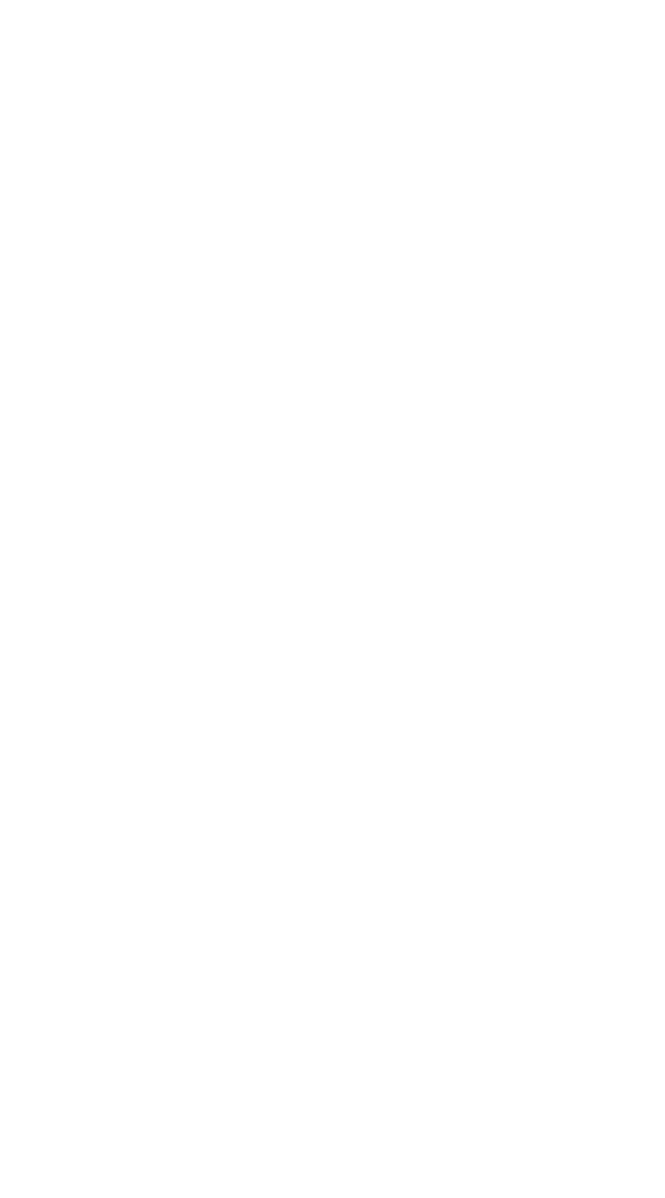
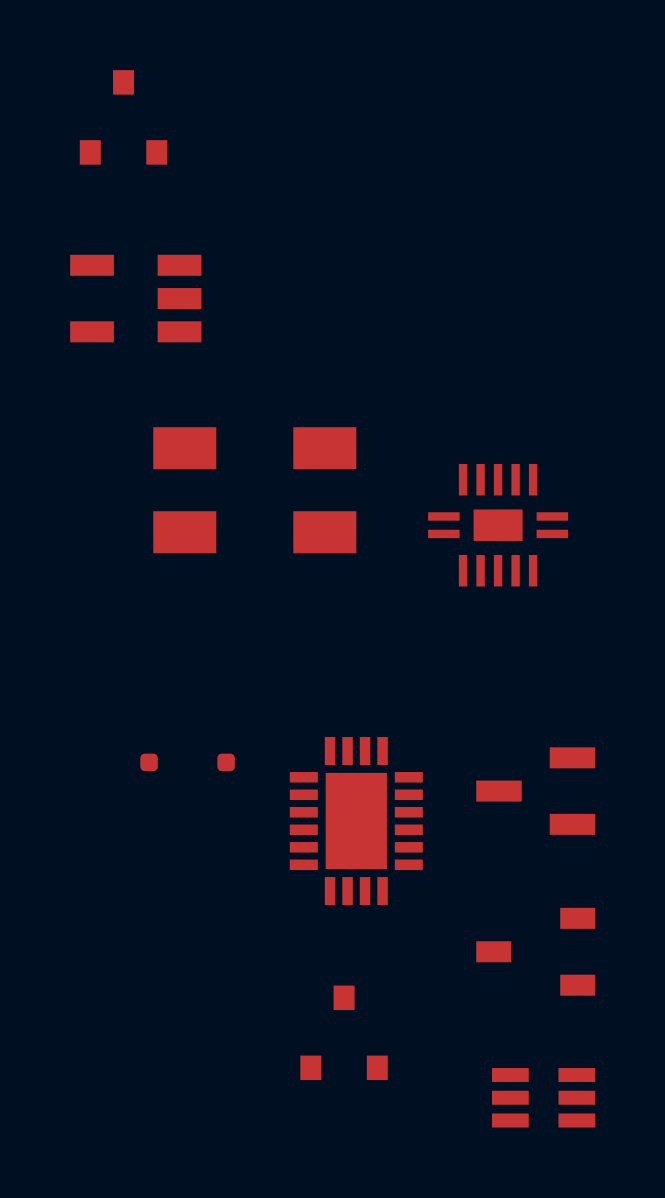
part: none -> (123, 117)
part: none -> (135, 298)
part: none -> (254, 490)
part: none -> (498, 525)
part: none -> (187, 762)
part: none -> (535, 791)
part: none -> (356, 821)
part: none -> (535, 951)
part: none -> (344, 1032)
part: none -> (543, 1097)

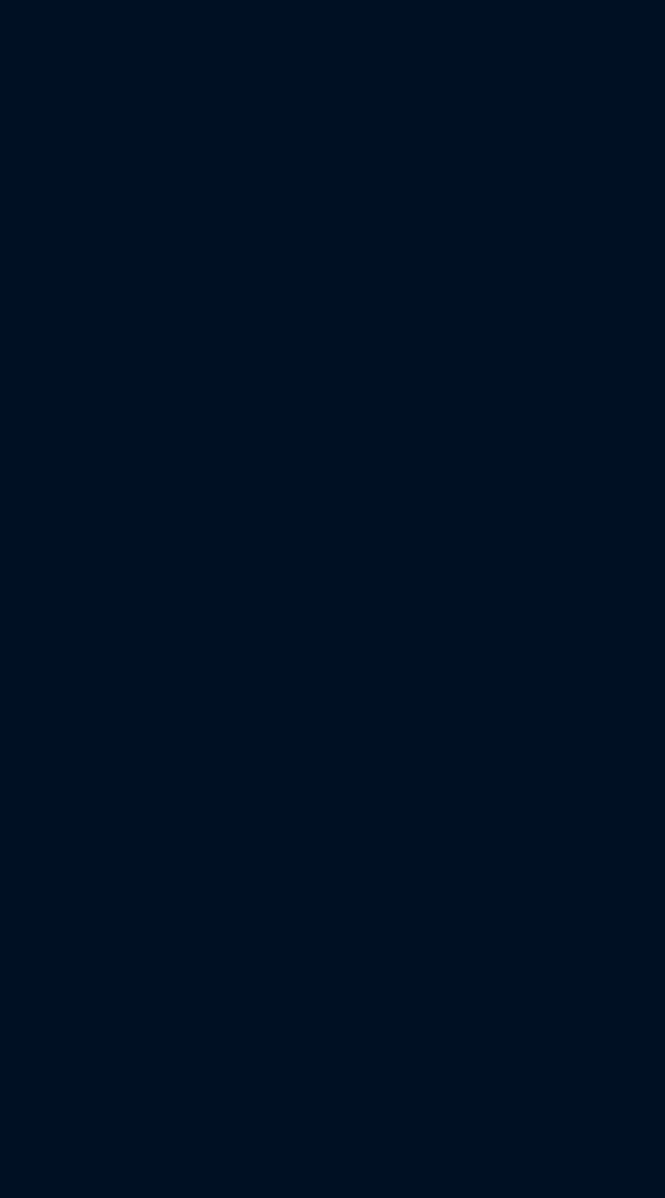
part: (123, 117) -> none
part: (135, 298) -> none
part: (254, 490) -> none
part: (498, 525) -> none
part: (187, 762) -> none
part: (535, 791) -> none
part: (356, 821) -> none
part: (535, 951) -> none
part: (344, 1032) -> none
part: (543, 1097) -> none

